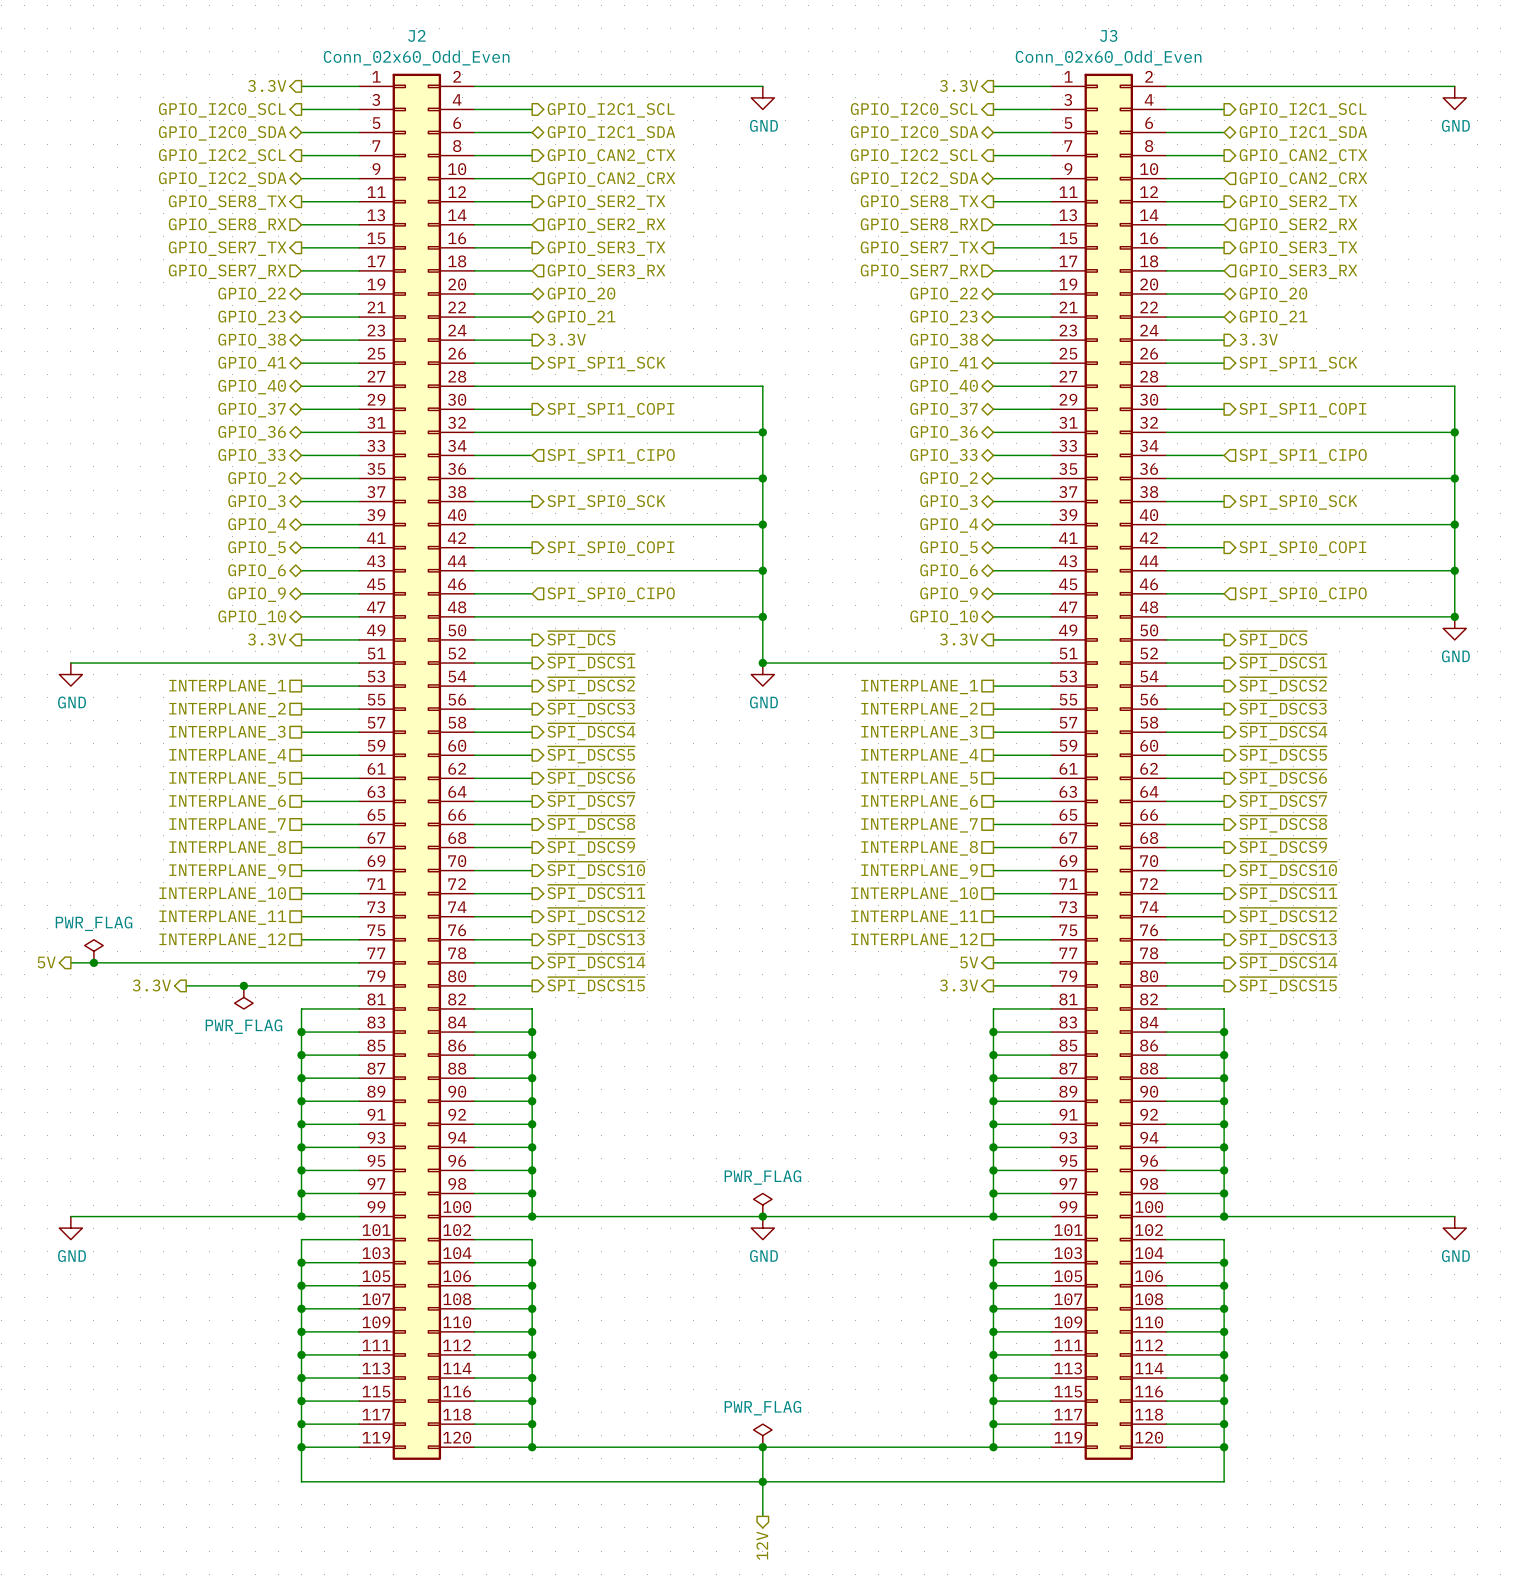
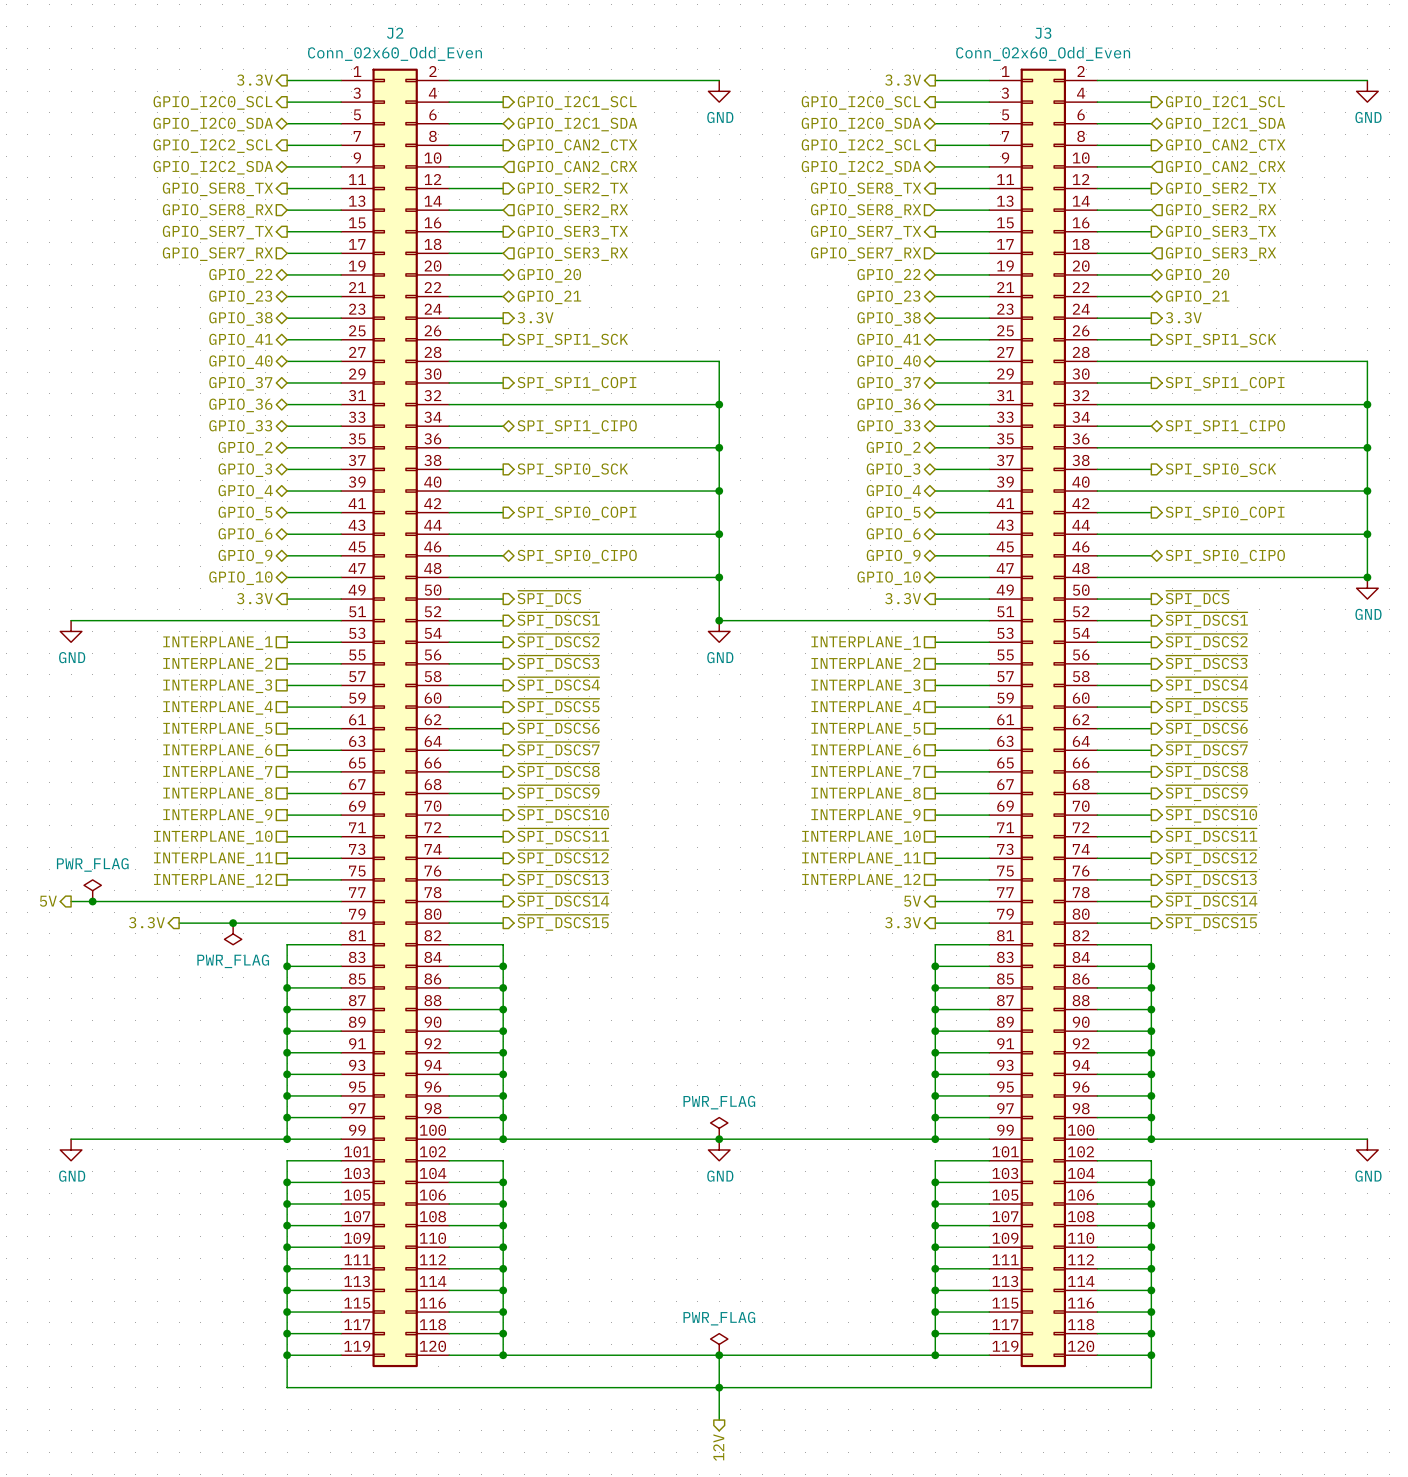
hierarchical label shape: input (611, 456) -> bidirectional (577, 427)
hierarchical label shape: input (1303, 456) -> bidirectional (1225, 427)
hierarchical label shape: input (611, 594) -> bidirectional (577, 556)
hierarchical label shape: input (1303, 594) -> bidirectional (1225, 556)

